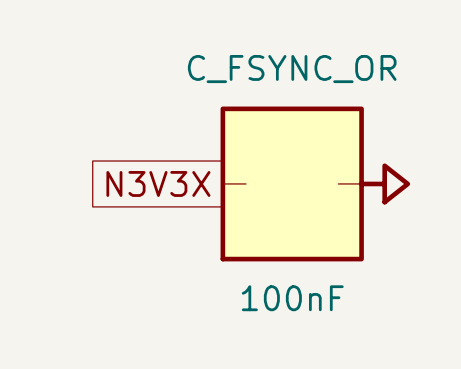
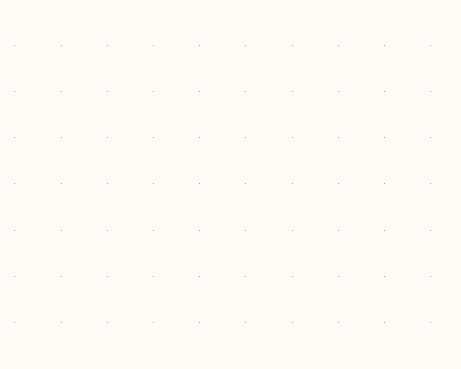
global label: N3V3X (158, 183) -> none
C_FSYNC_OR: 100nF (292, 183) -> none
power symbol: (384, 183) -> none

